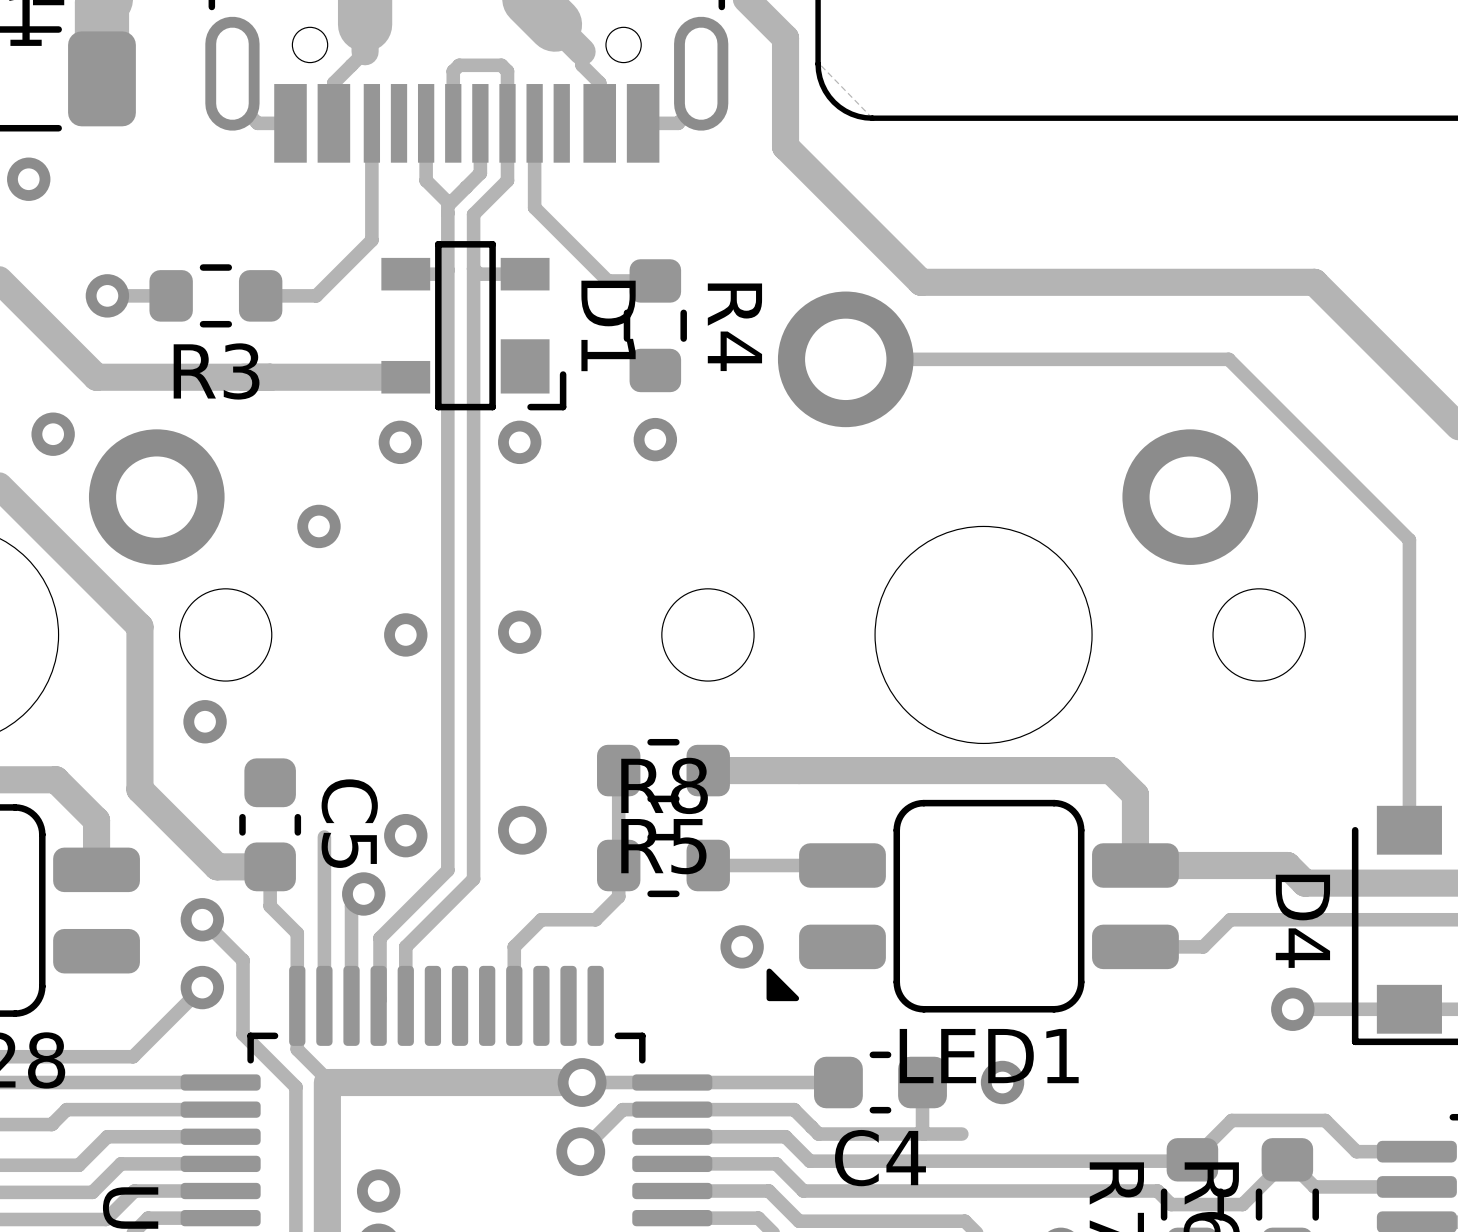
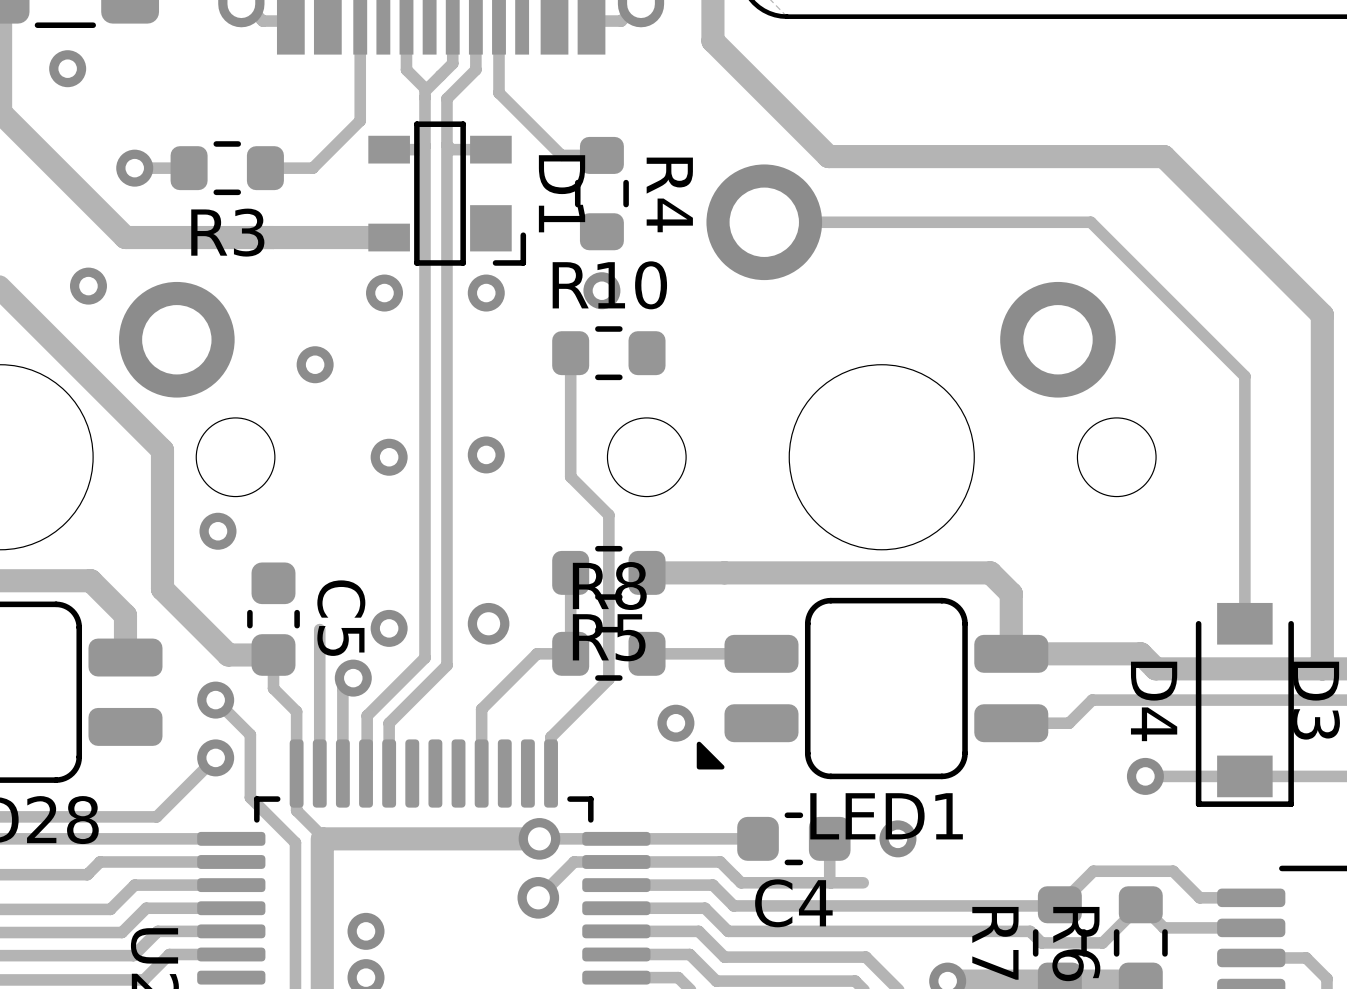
track: none -> (570, 353) (570, 476) (608, 515) (608, 679) (551, 737) (551, 773)
R10: none -> (608, 353)
track: (618, 865) (618, 896) (595, 919) (541, 919) (514, 946) -> (570, 653) (537, 653) (481, 709) (481, 723)

